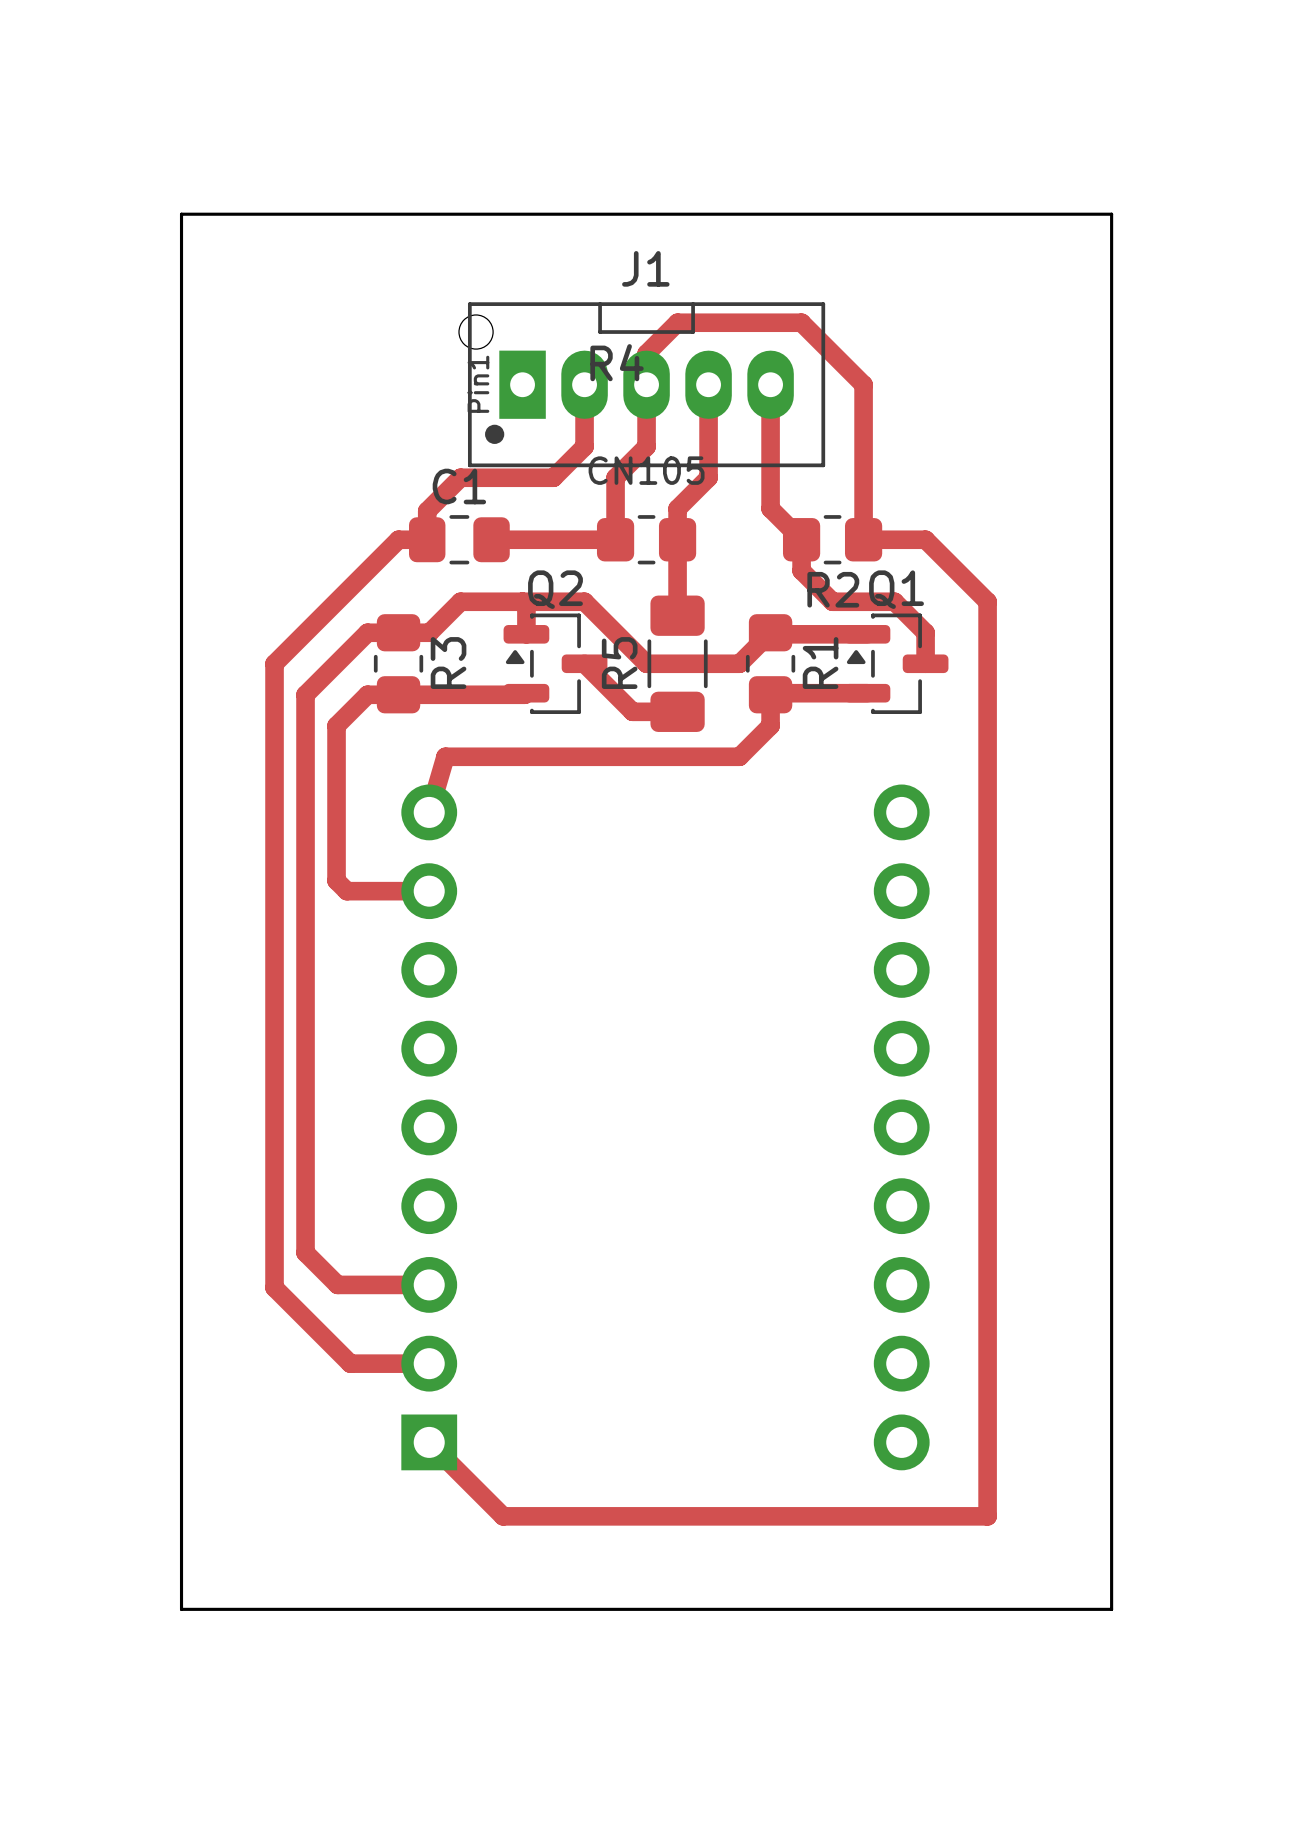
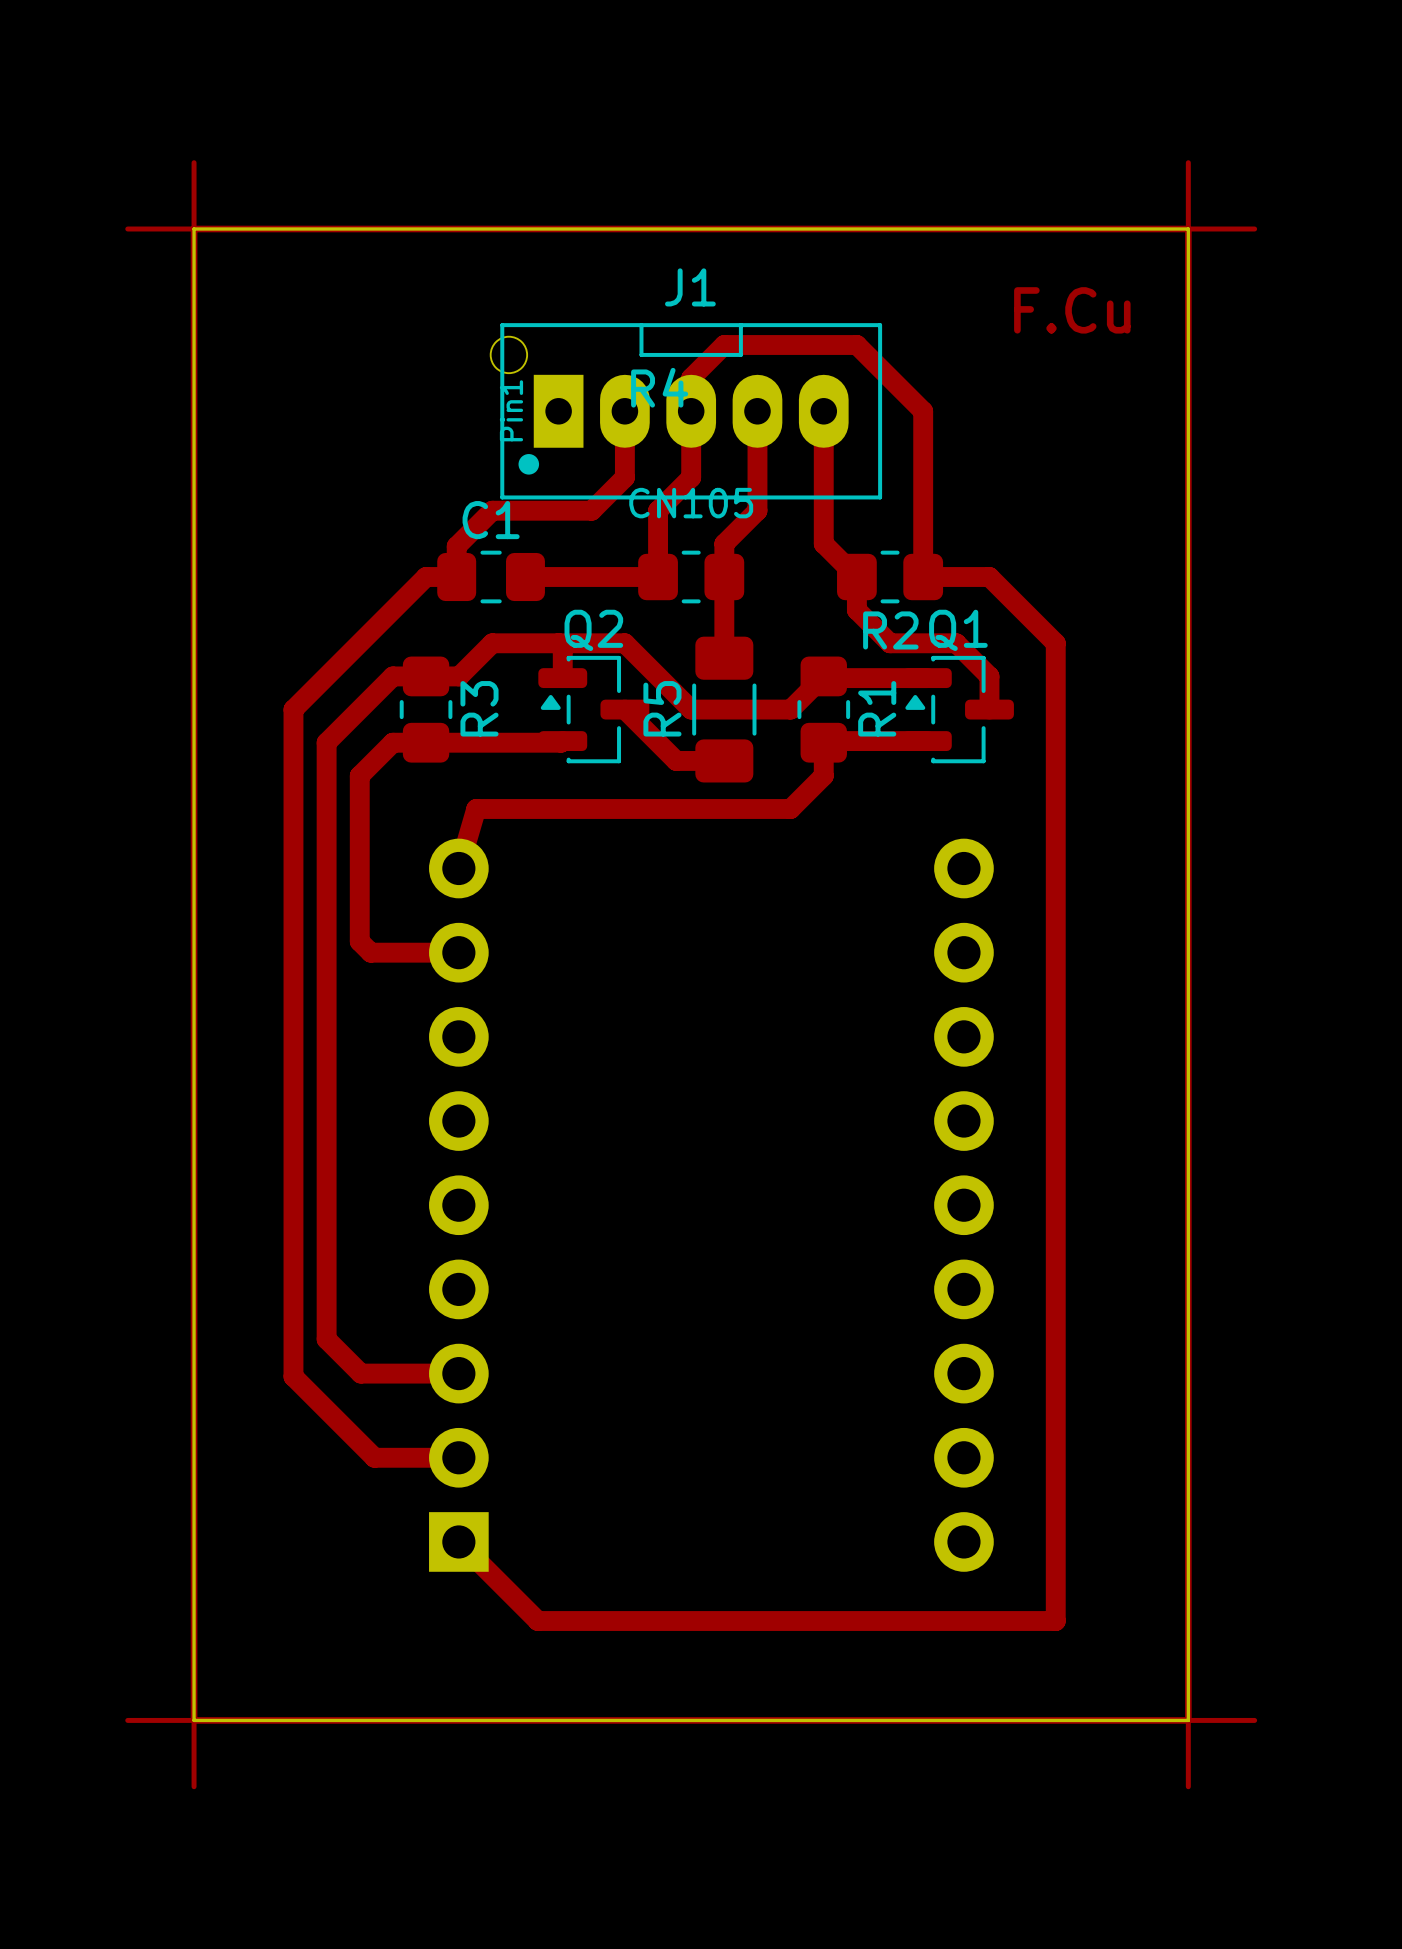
top track: none -> (194, 162) (194, 295)
top track: none -> (1188, 162) (1188, 295)
top track: none -> (127, 229) (260, 229)
top track: none -> (194, 229) (1188, 229) (1188, 1720) (194, 1720) (194, 229)
top track: none -> (1122, 229) (1254, 229)
text: none -> F.Cu (1072, 310)
top track: none -> (194, 1654) (194, 1786)
top track: none -> (1188, 1654) (1188, 1786)
top track: none -> (127, 1720) (260, 1720)
top track: none -> (1122, 1720) (1254, 1720)

